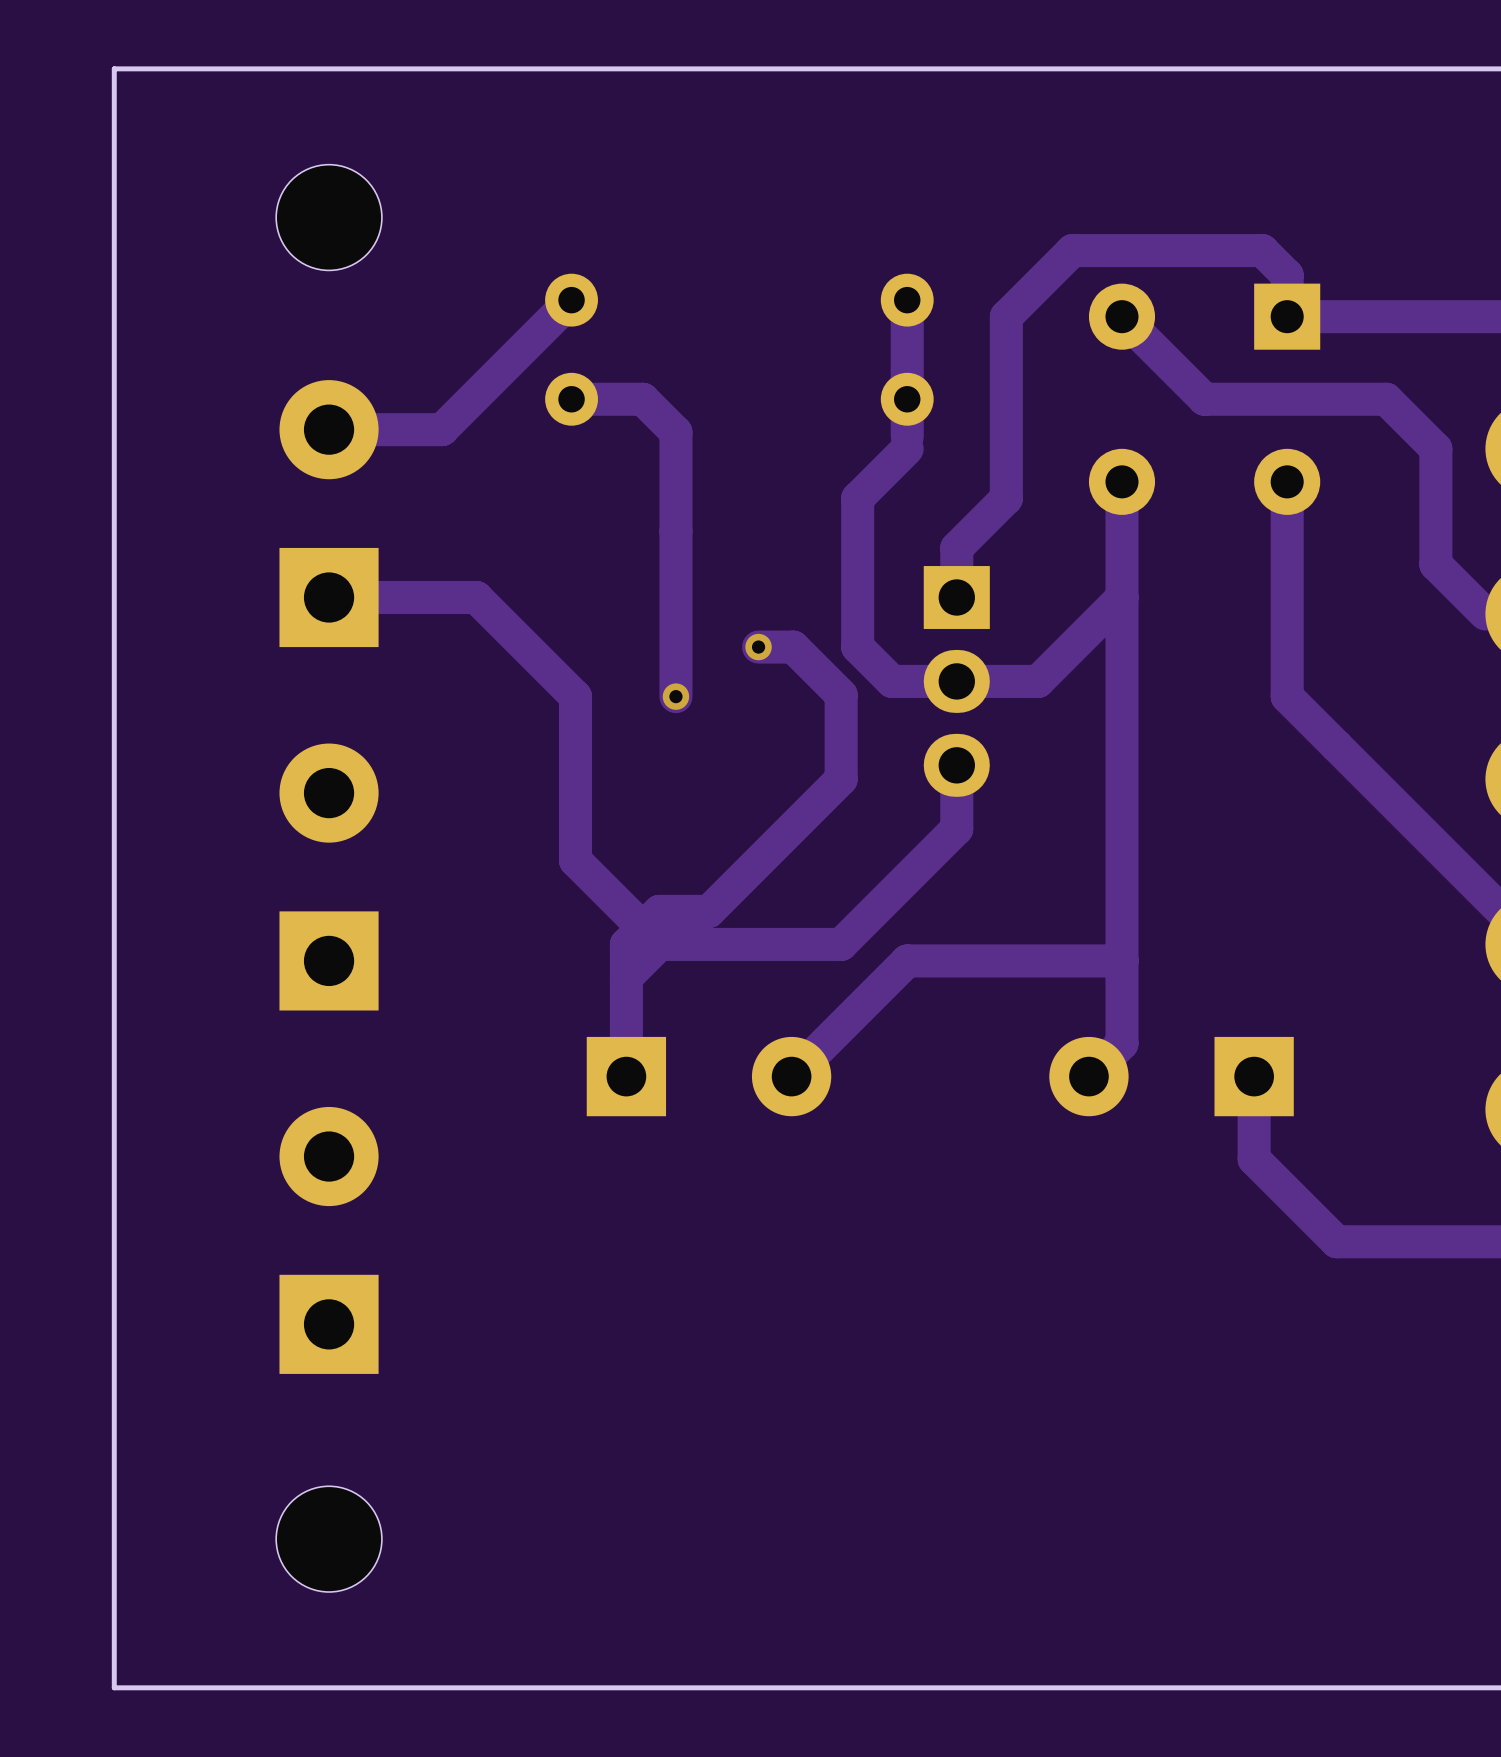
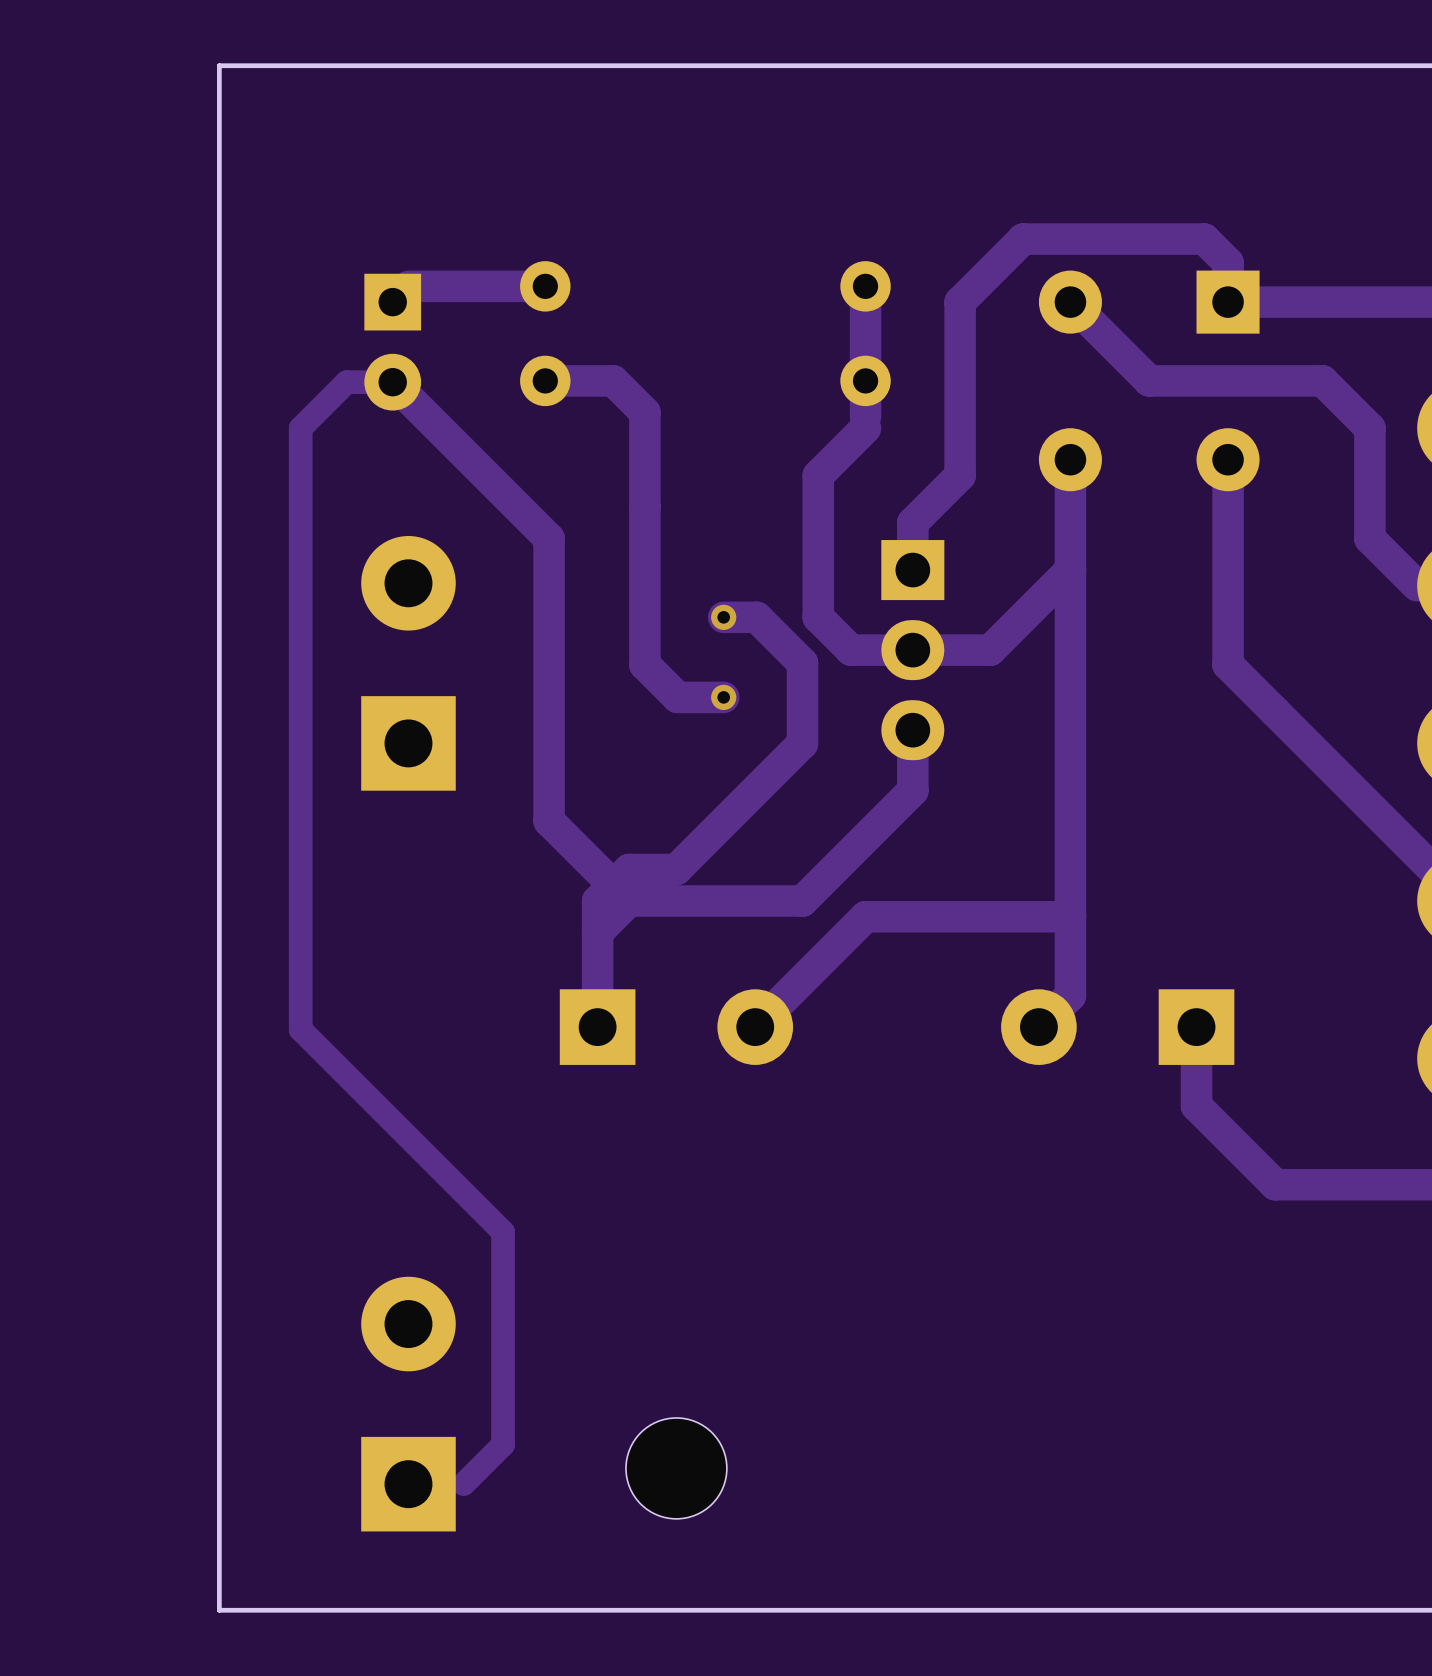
board edge: (229, 68) (114, 68) (114, 1687) (229, 1687) -> (219, 65) (219, 1610)
part: (329, 217) -> none
track: (571, 300) (442, 429) (329, 429) -> (545, 286) (408, 286) (392, 302)
part: none -> (392, 342)
part: (329, 513) -> none
track: (329, 597) (476, 597) (575, 696) -> (408, 1484) (463, 1484) (503, 1444) (503, 1232) (300, 1029) (300, 428) (346, 382) (392, 382) (549, 538) (549, 664)
part: none -> (408, 663)
track: none -> (644, 664) (677, 697) (723, 697)
via position: (675, 696) -> (723, 697)
part: (329, 877) -> none
part position: (329, 1240) -> (408, 1404)
part position: (329, 1539) -> (676, 1468)

